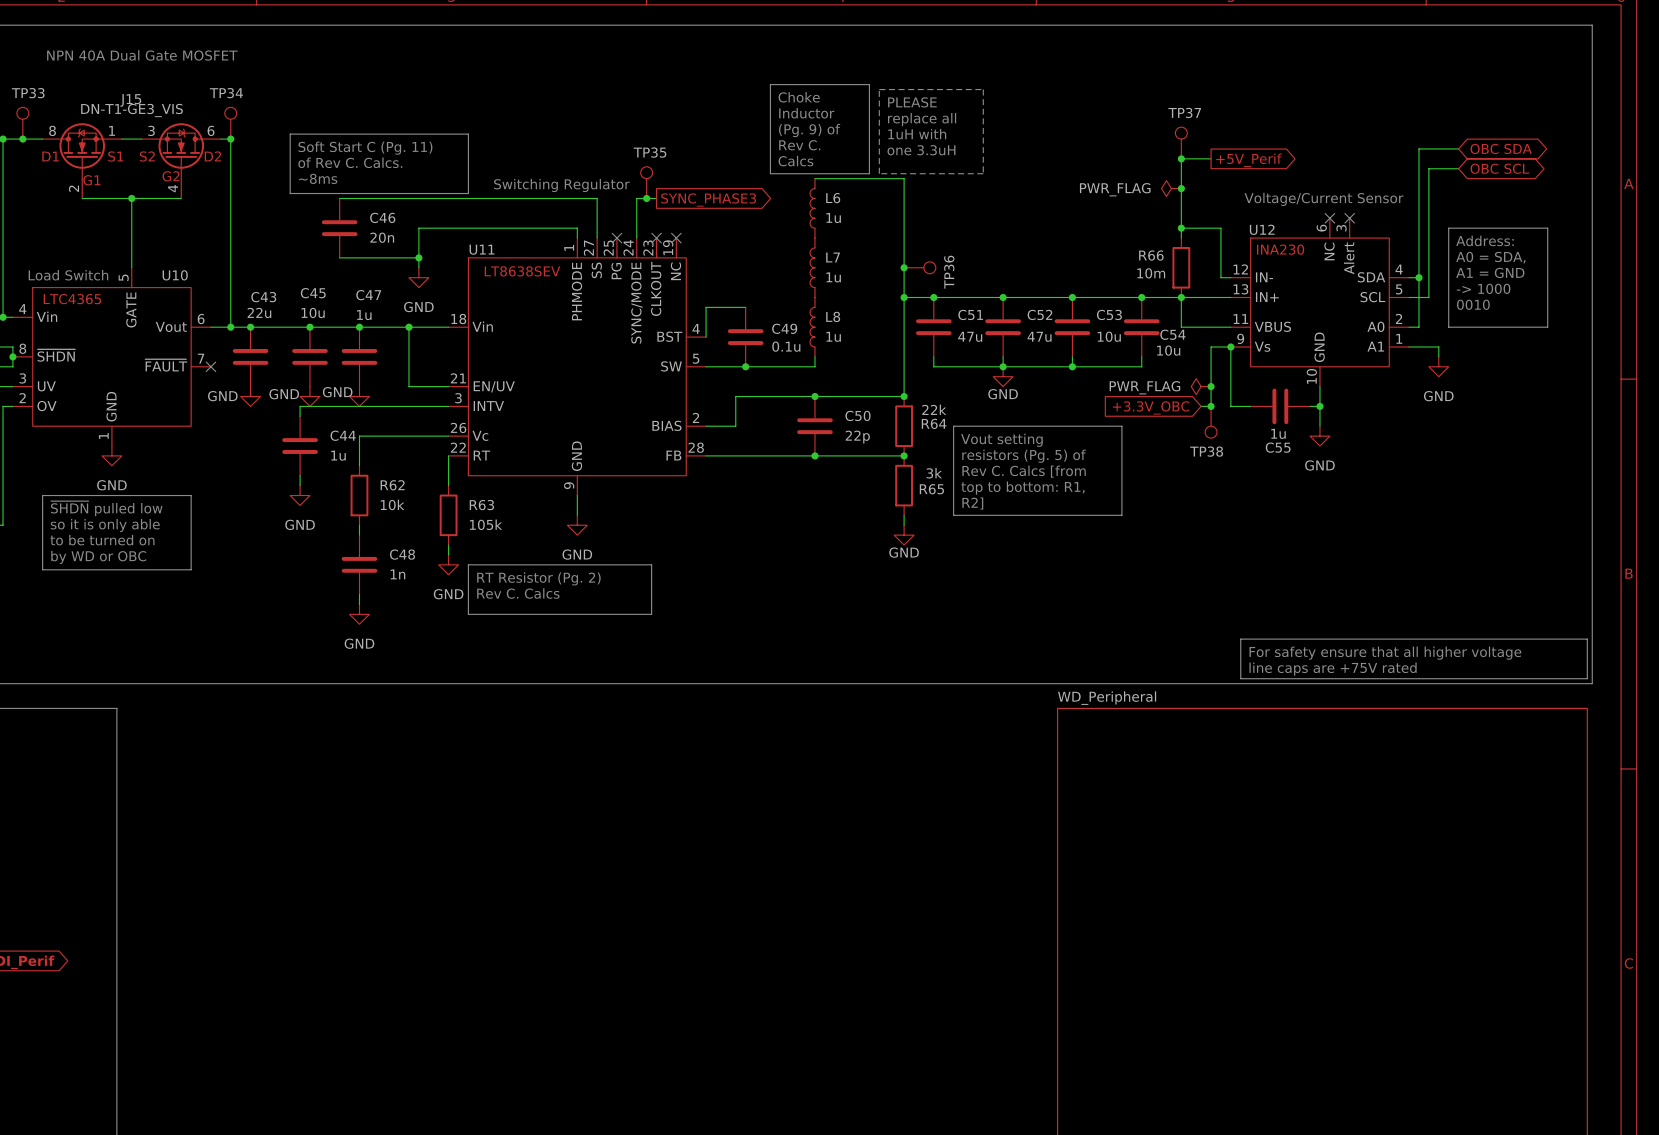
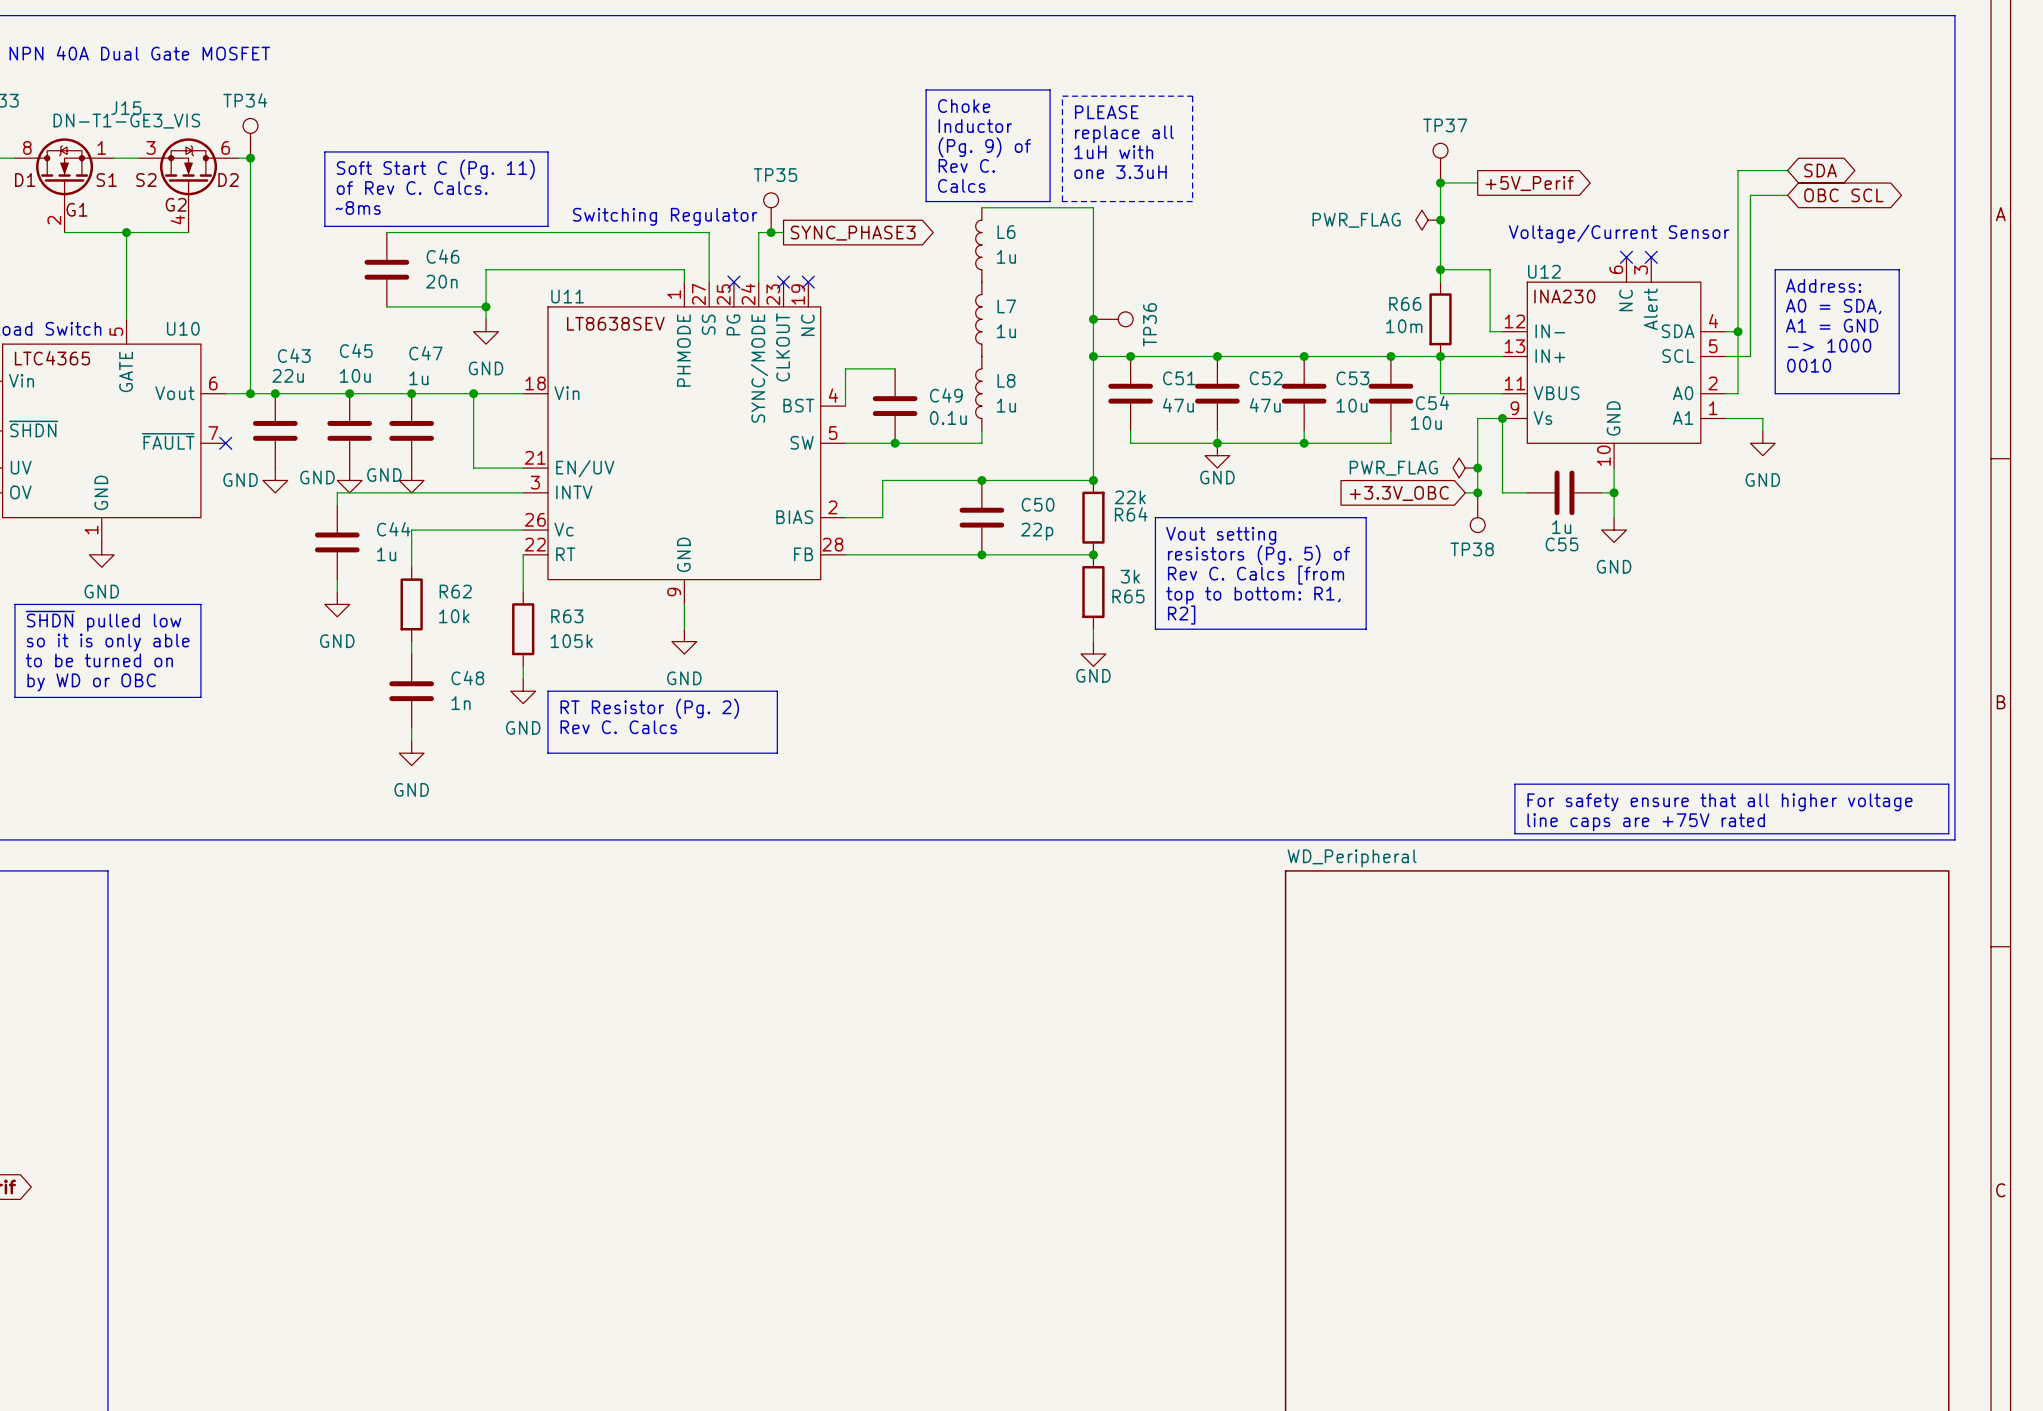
global label: OBC SDA (1501, 148) -> SDA (1820, 170)

